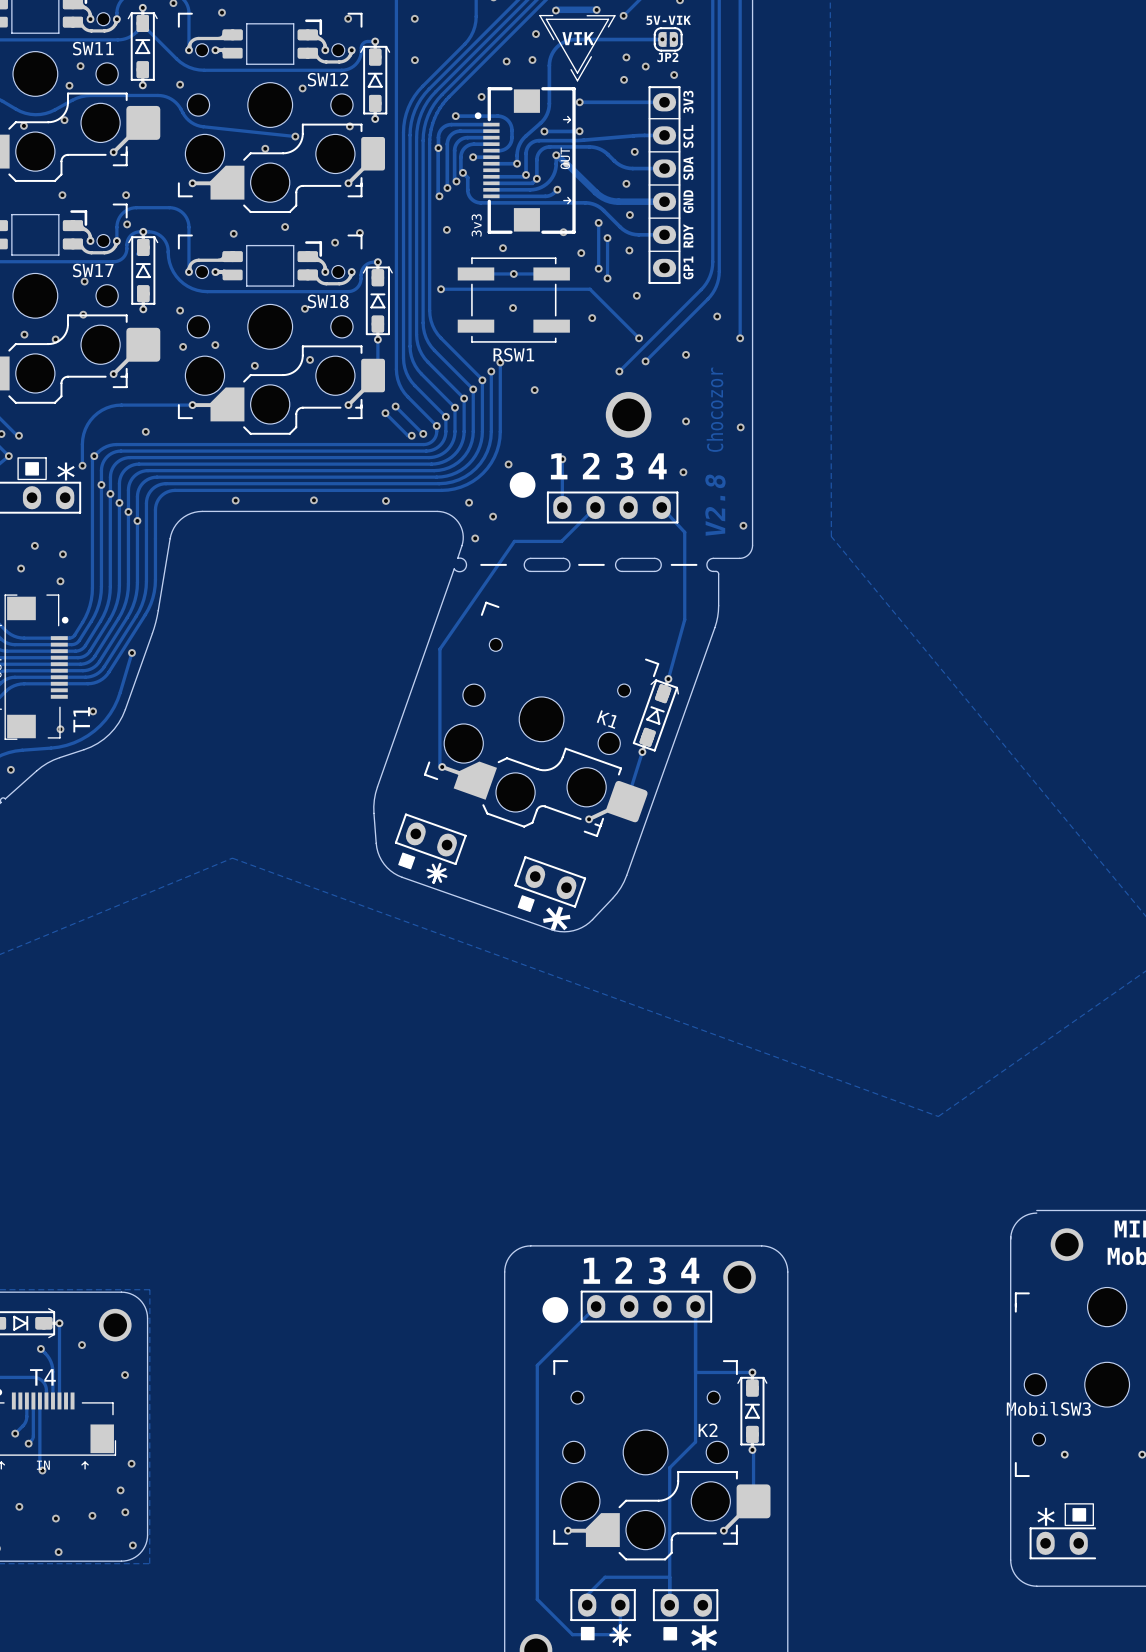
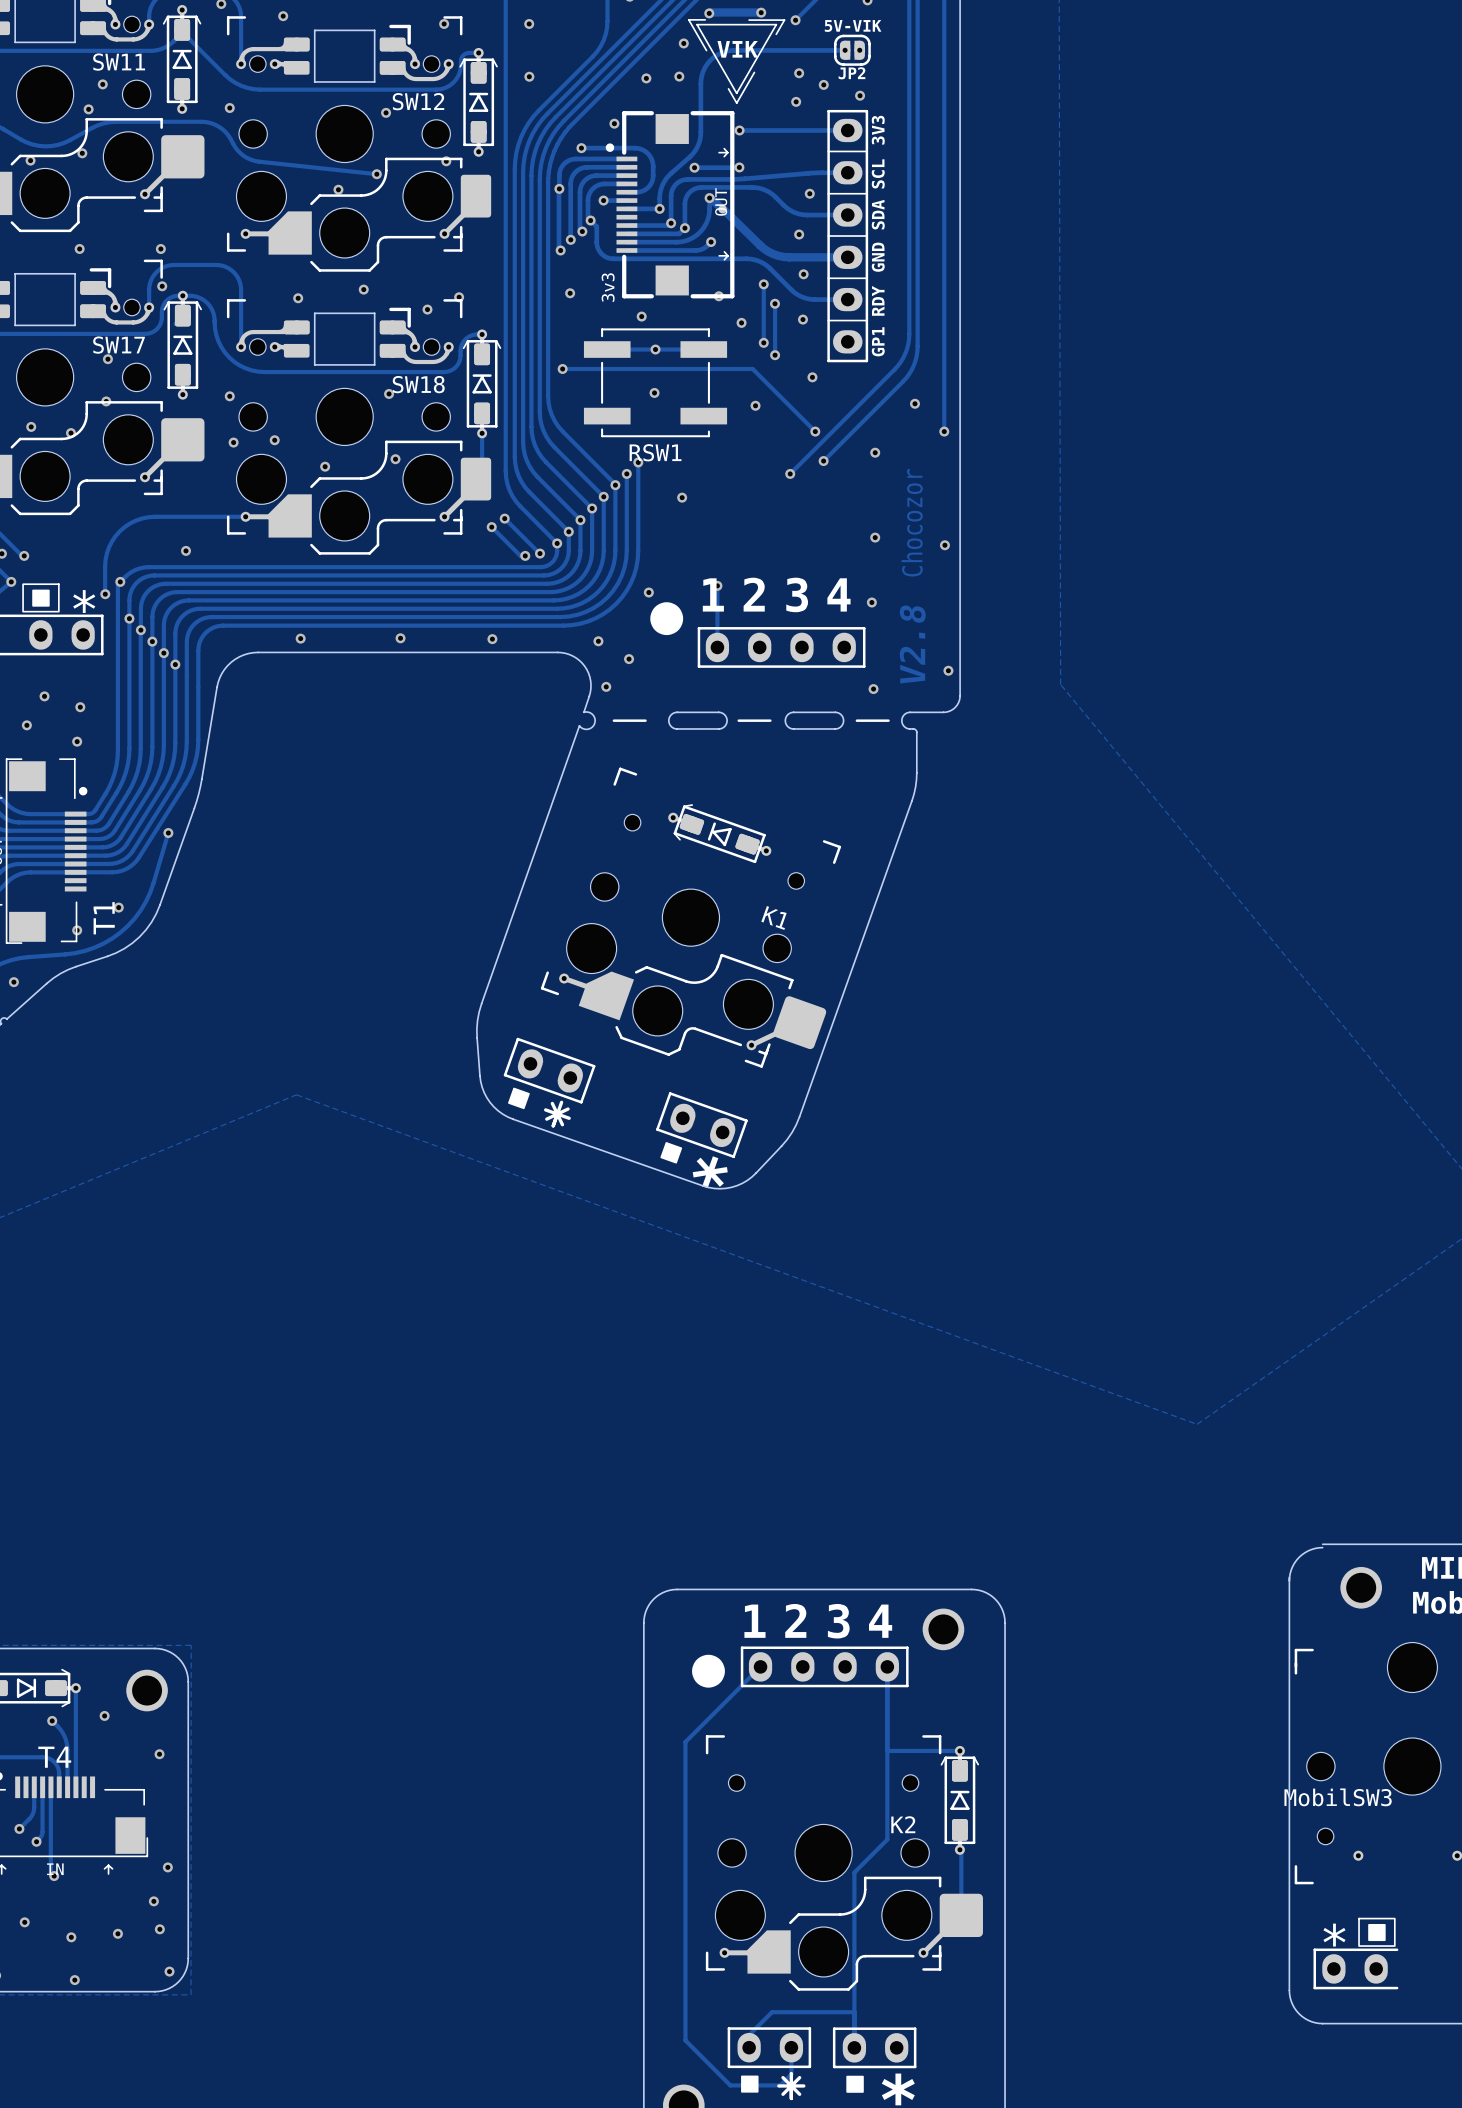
part: (628, 414) -> none
track: (595, 507) (561, 541) (514, 541) (439, 649) (439, 764) (442, 767) -> none
track: (661, 507) (684, 532) (684, 619) (668, 679) -> none
via: none -> (873, 689)
K1 footprint: [394, 601, 679, 913] -> [503, 767, 842, 1164]
track: (642, 752) (626, 801) -> none

